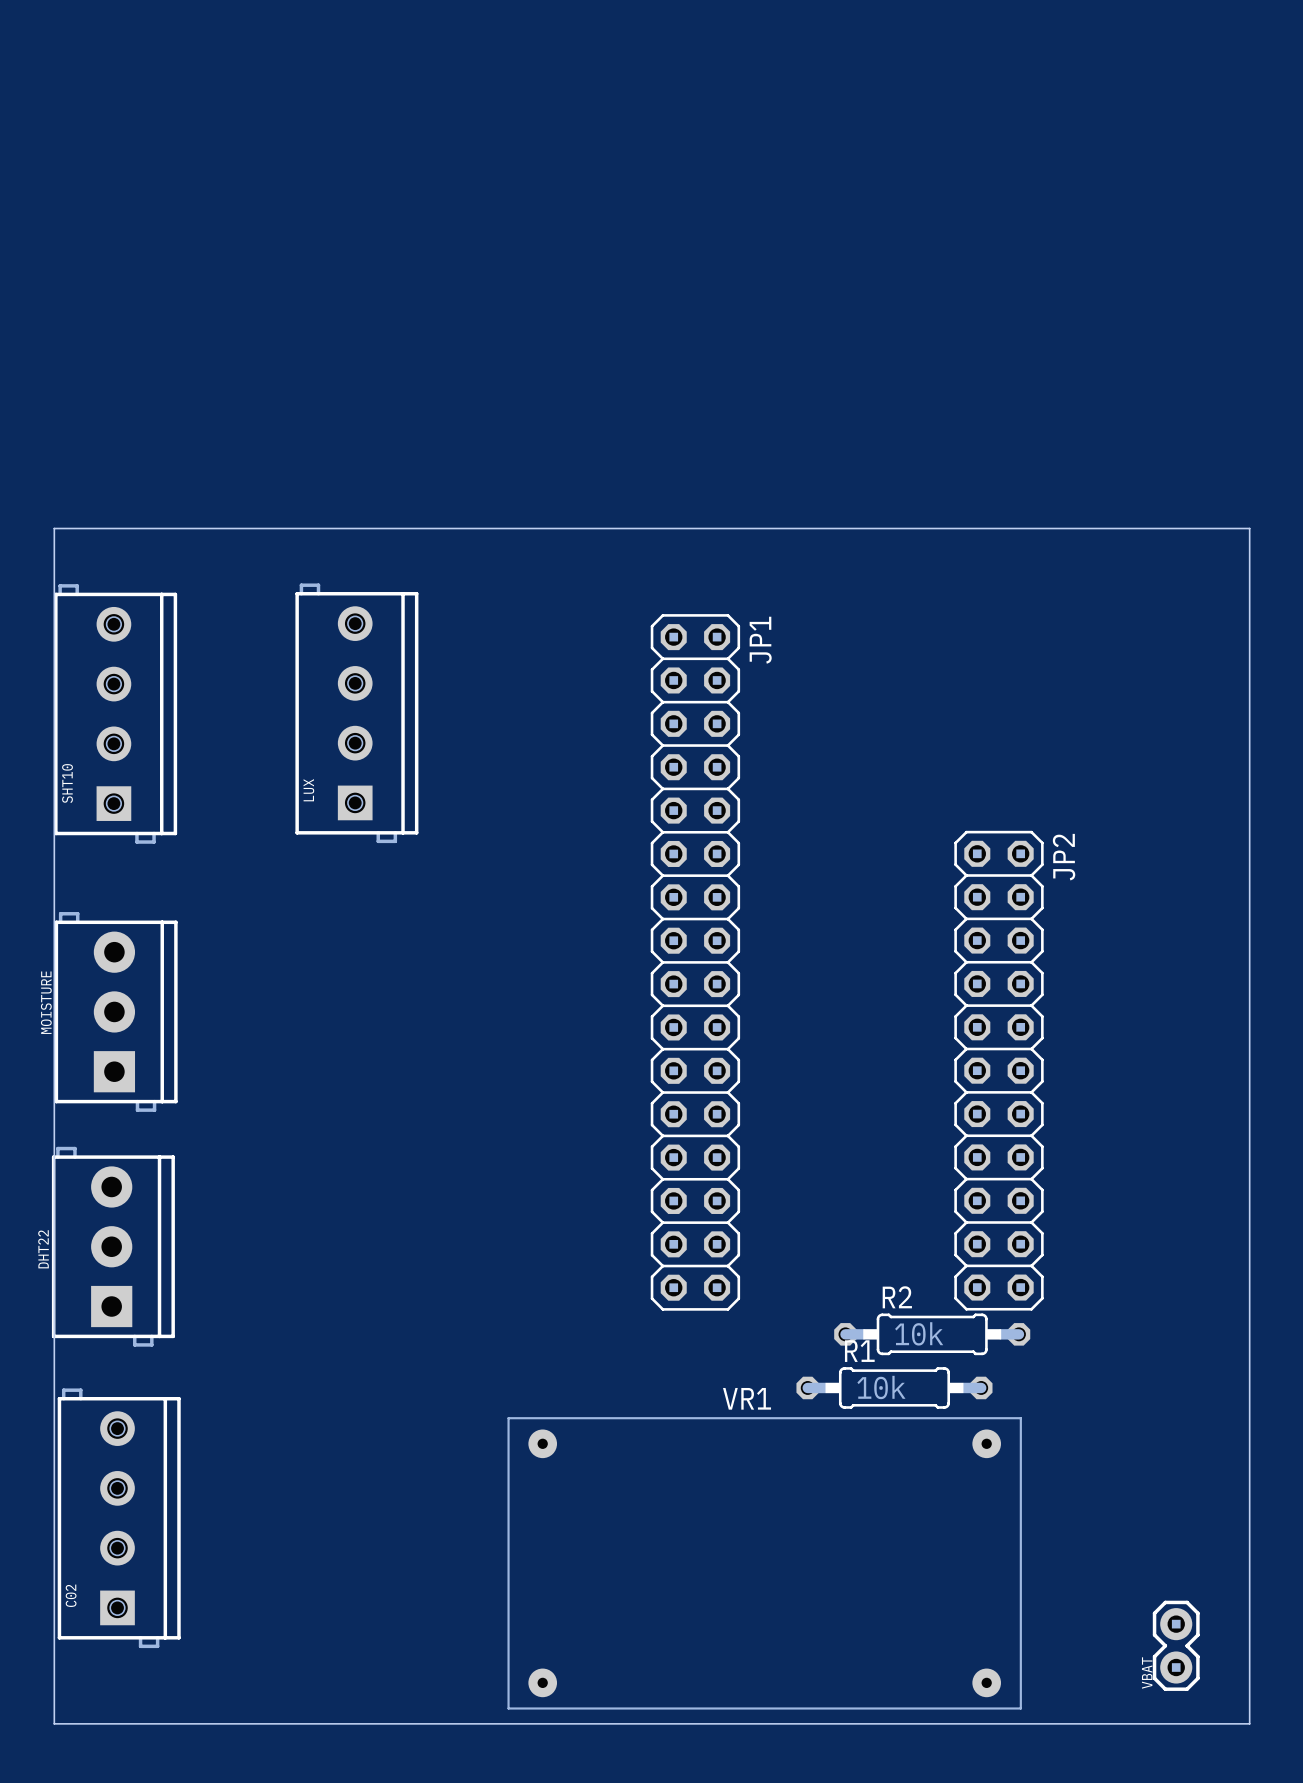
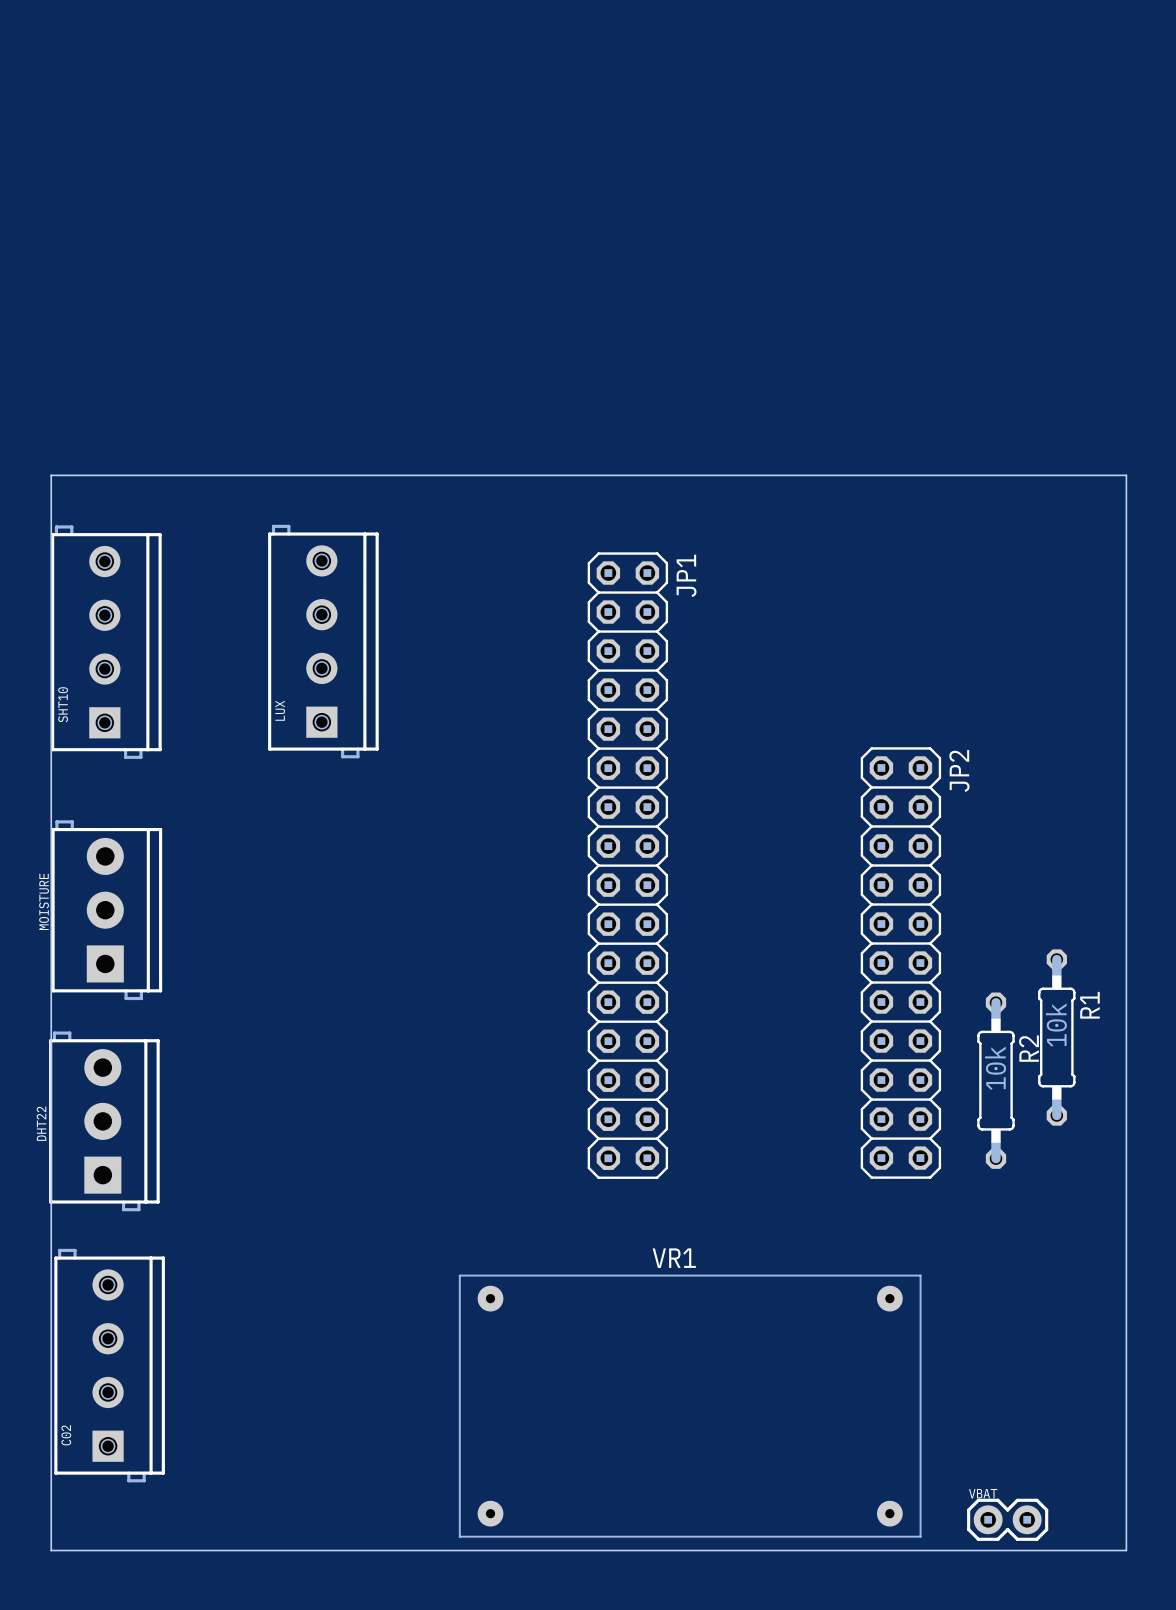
R2 rotation: 0° (932, 1334) -> 90° clockwise (995, 1080)
R2 position: (932, 1334) -> (995, 1080)
R1 rotation: 0° (894, 1387) -> 90° clockwise (1056, 1037)
R1 position: (894, 1387) -> (1056, 1037)
VBAT rotation: 0° (1176, 1645) -> 90° clockwise (1007, 1519)
VBAT position: (1176, 1645) -> (1007, 1519)

